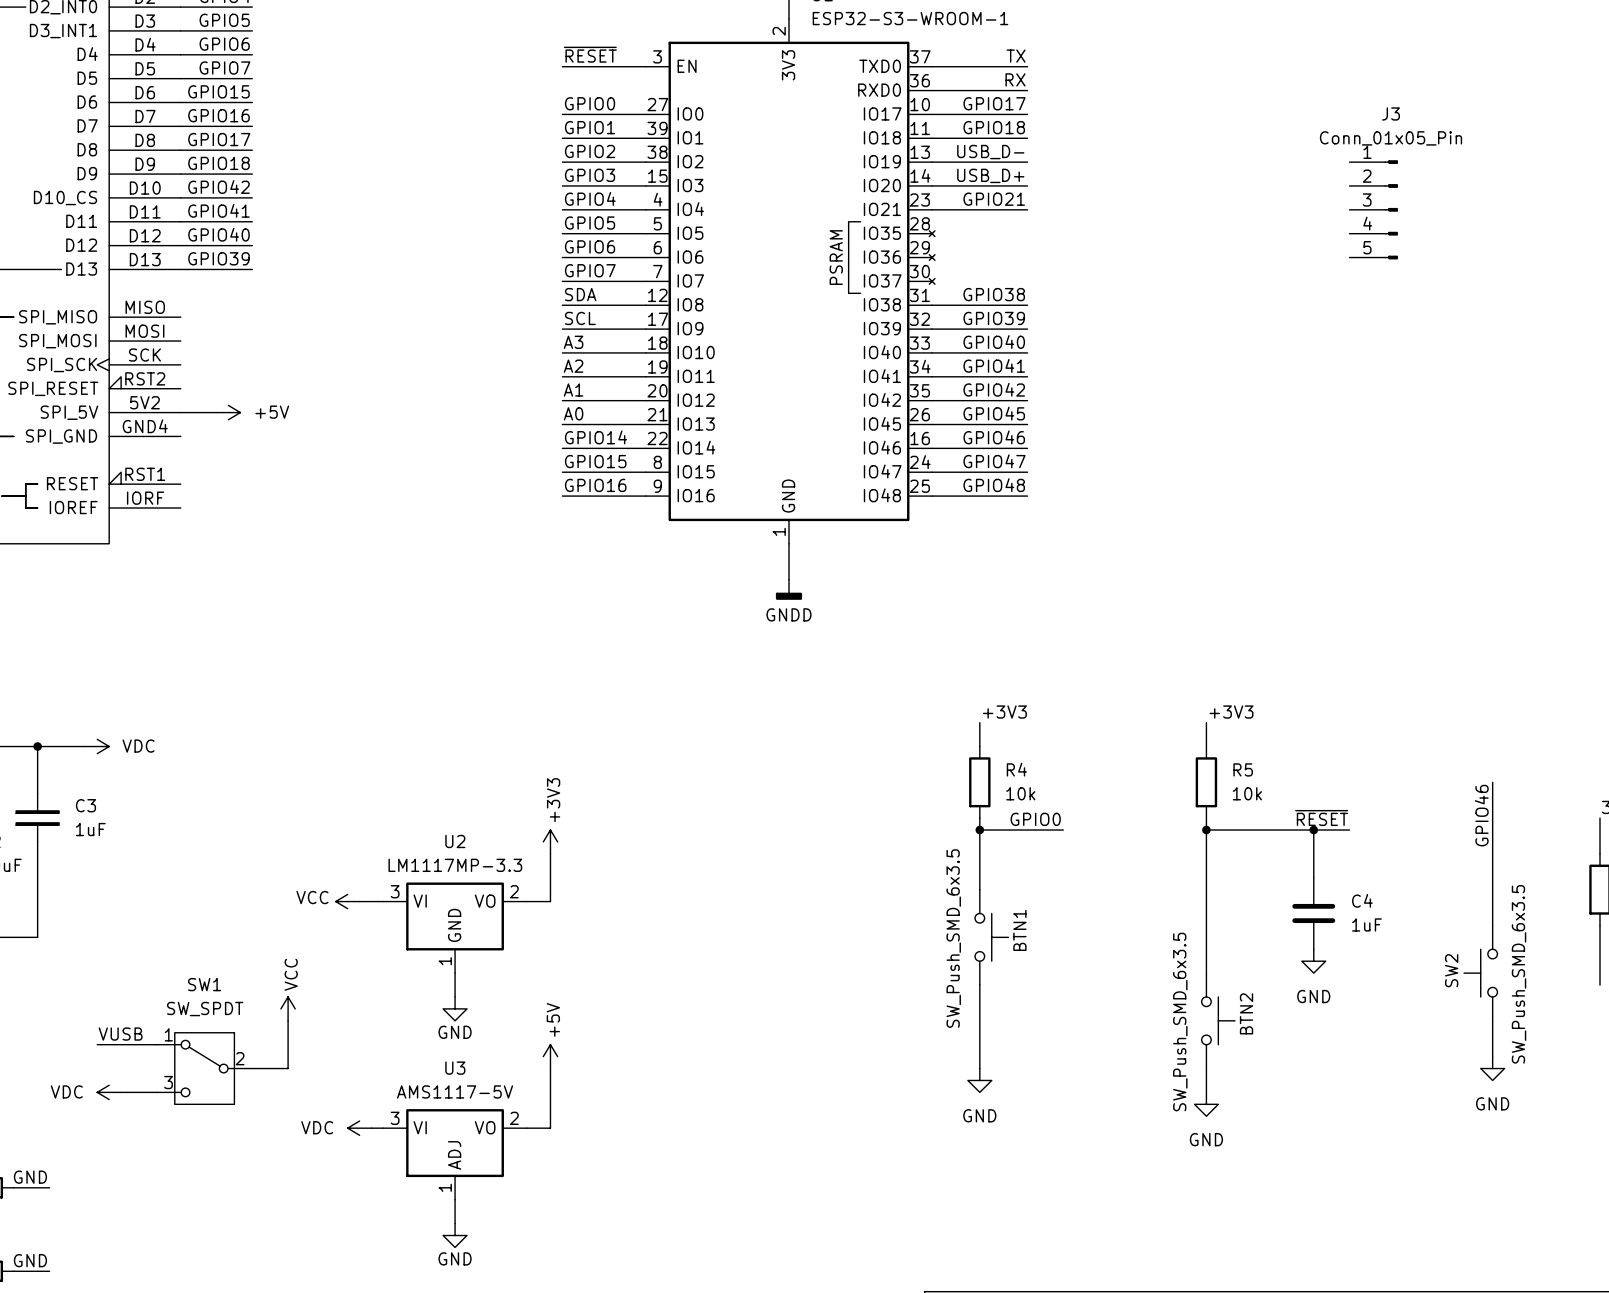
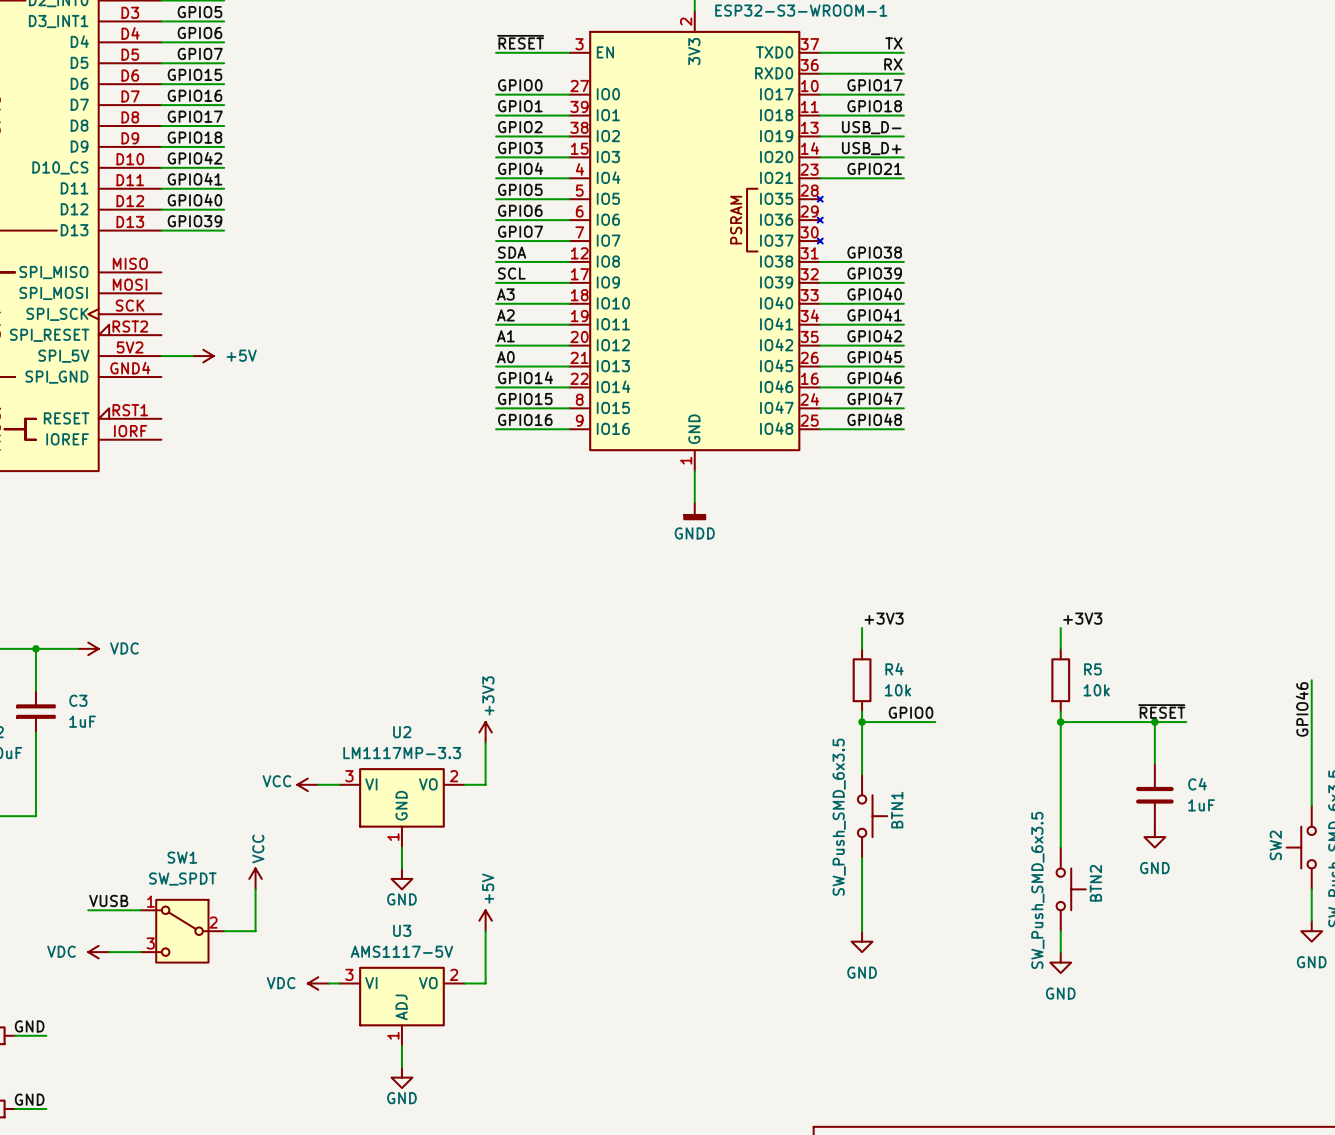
J3: Conn_01x05_Pin (1373, 209) -> none

